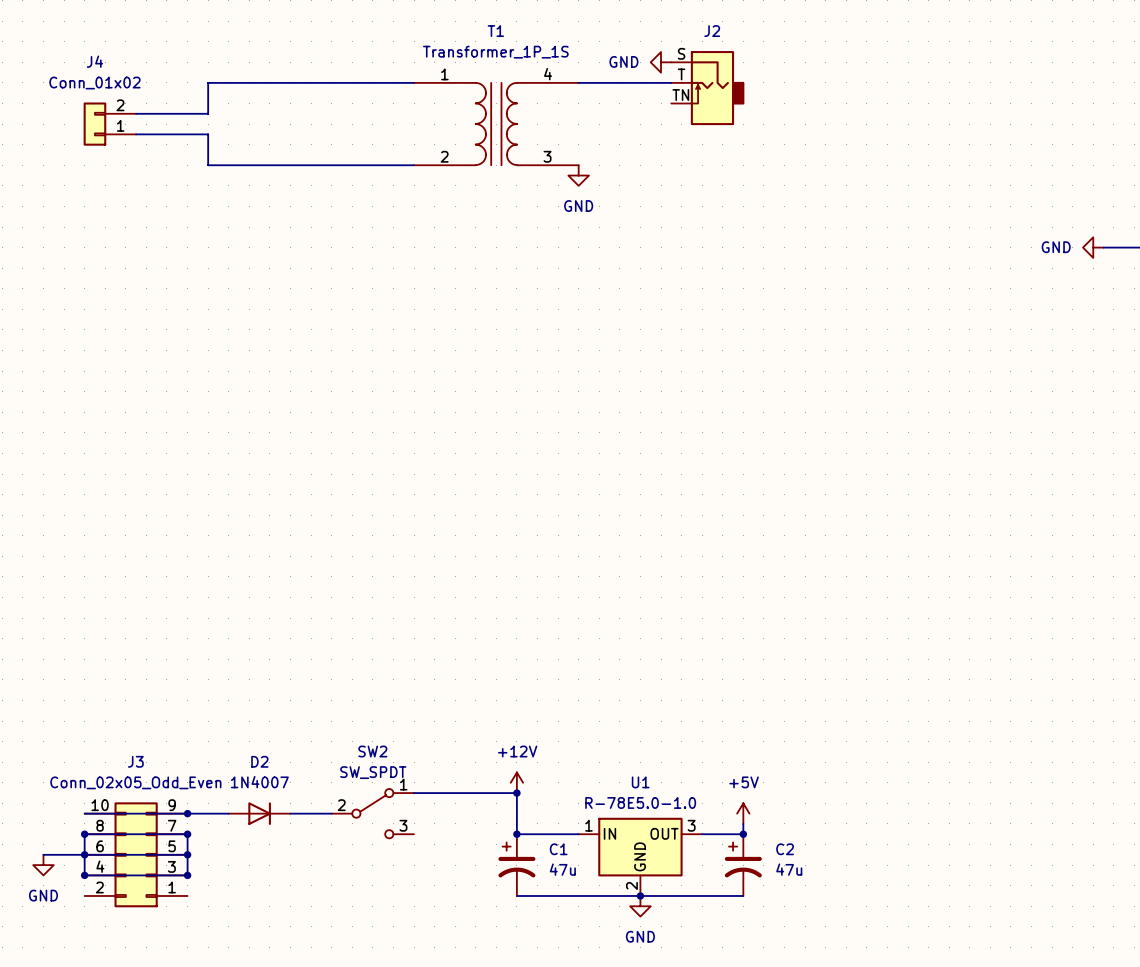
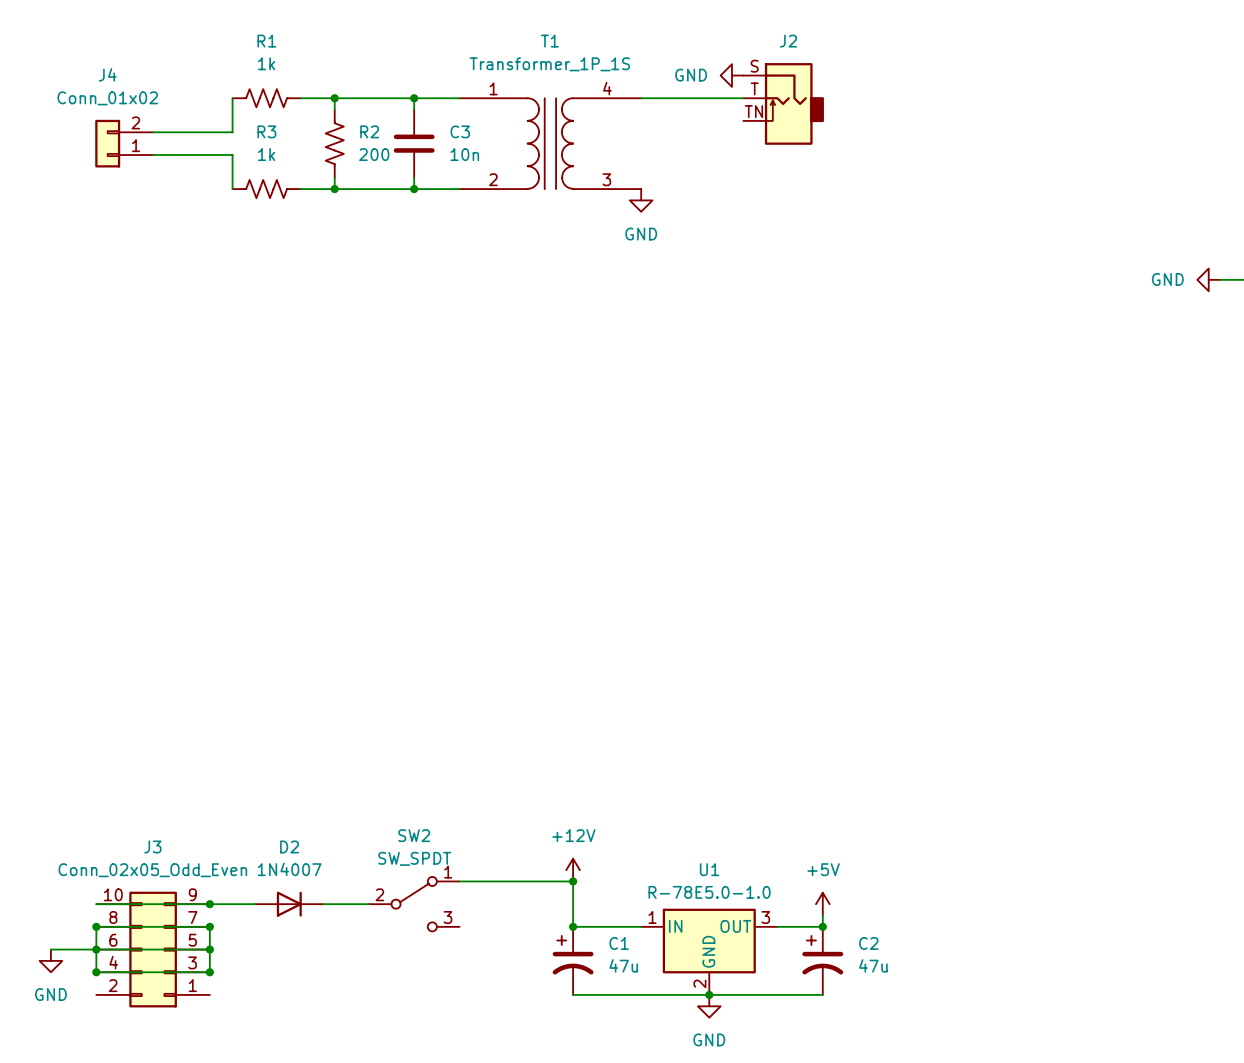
R1: none -> 1k (266, 98)
wire: none -> (334, 98) (334, 109)
junction: none -> (334, 98)
wire: none -> (414, 98) (414, 109)
junction: none -> (414, 98)
R2: none -> 200 (334, 143)
C3: none -> 10n (414, 143)
wire: none -> (334, 177) (334, 189)
wire: none -> (414, 177) (414, 189)
R3: none -> 1k (266, 189)
junction: none -> (334, 189)
junction: none -> (414, 189)

